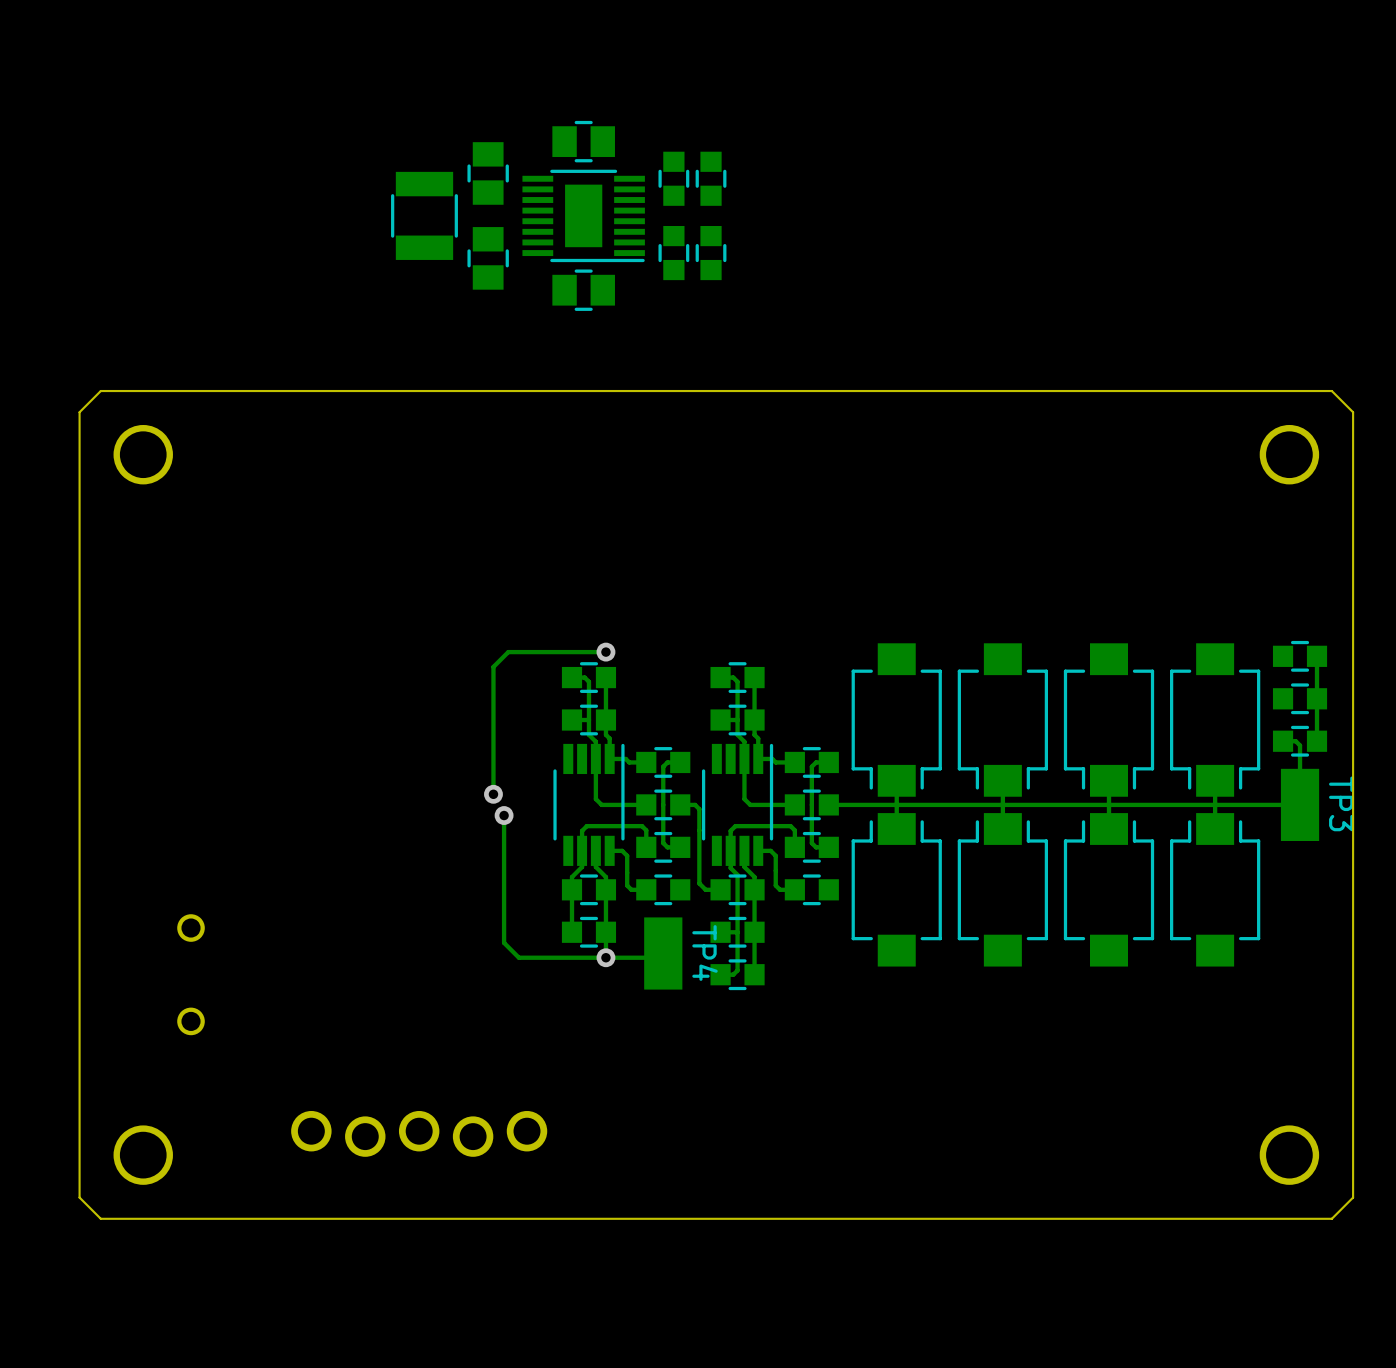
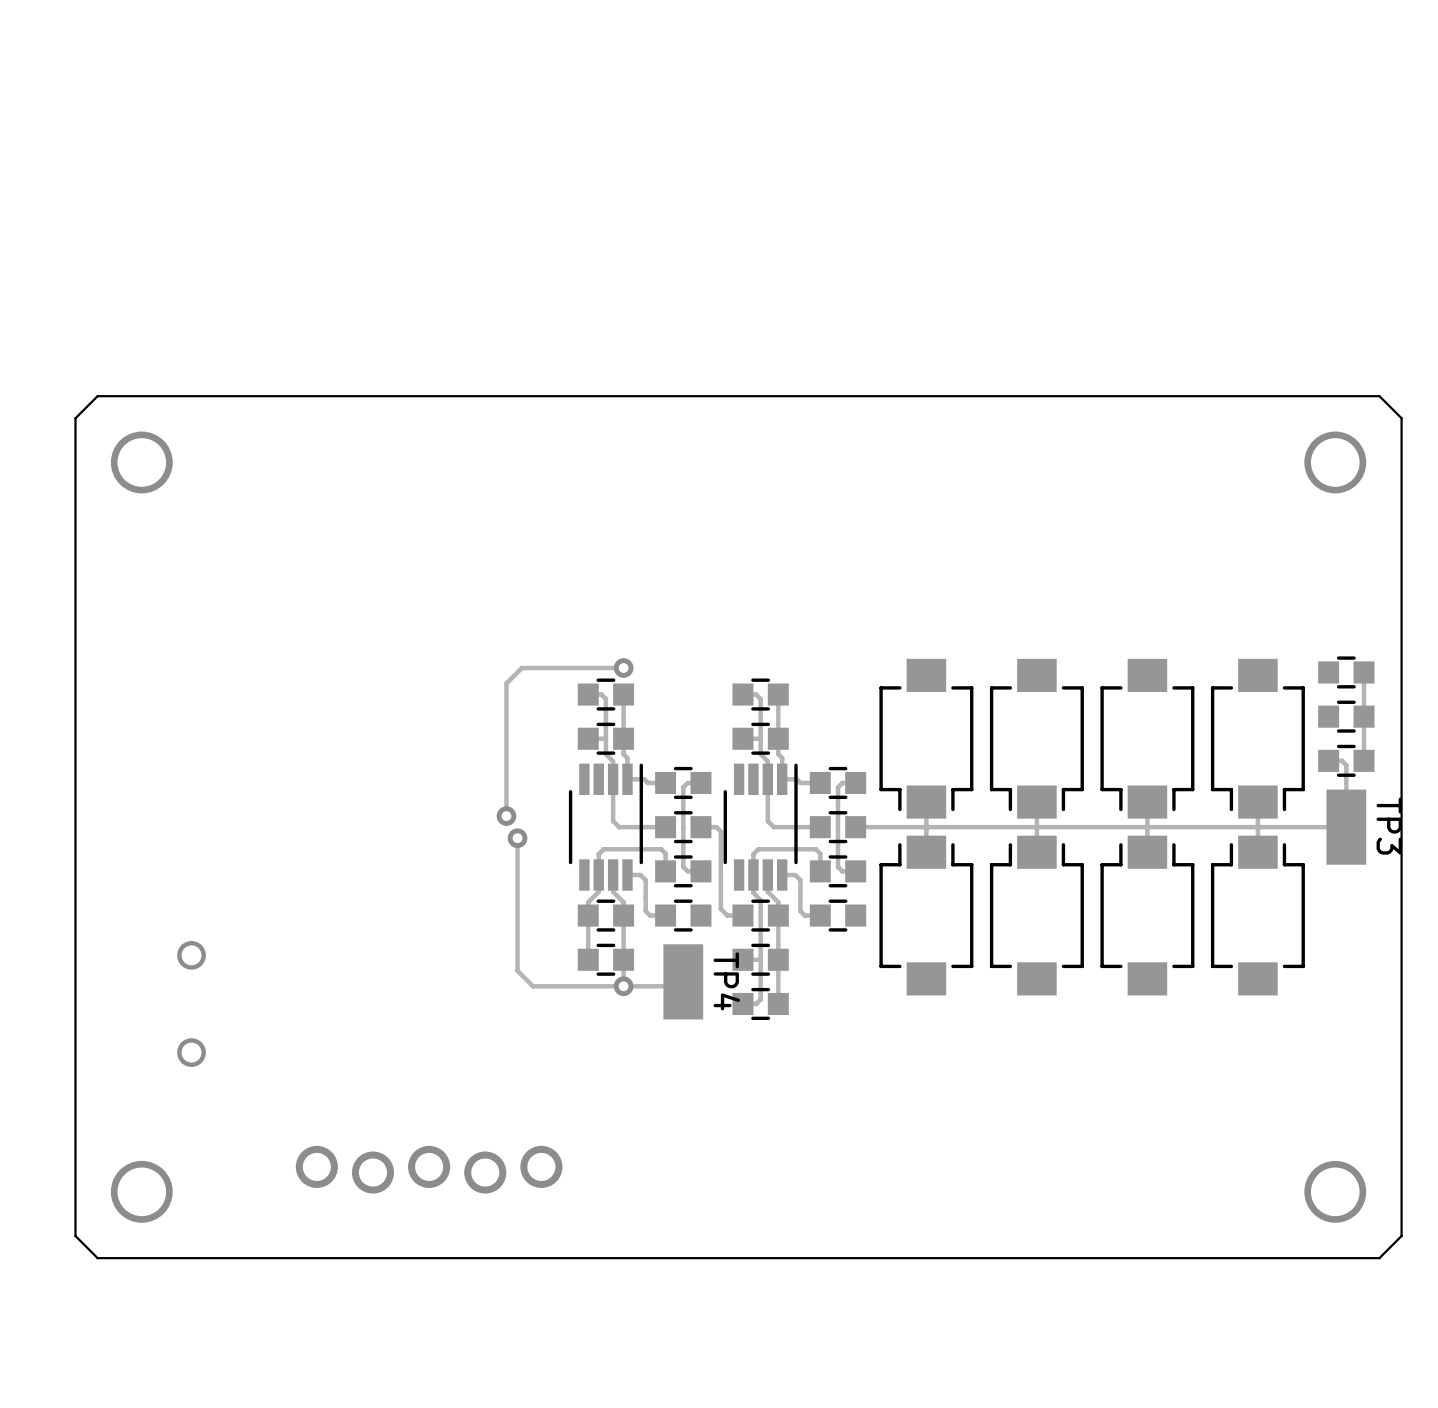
part: (583, 141) -> none
part: (488, 173) -> none
part: (673, 178) -> none
part: (711, 178) -> none
part: (424, 215) -> none
part: (583, 215) -> none
part: (673, 253) -> none
part: (711, 253) -> none
part: (488, 258) -> none
part: (583, 290) -> none

